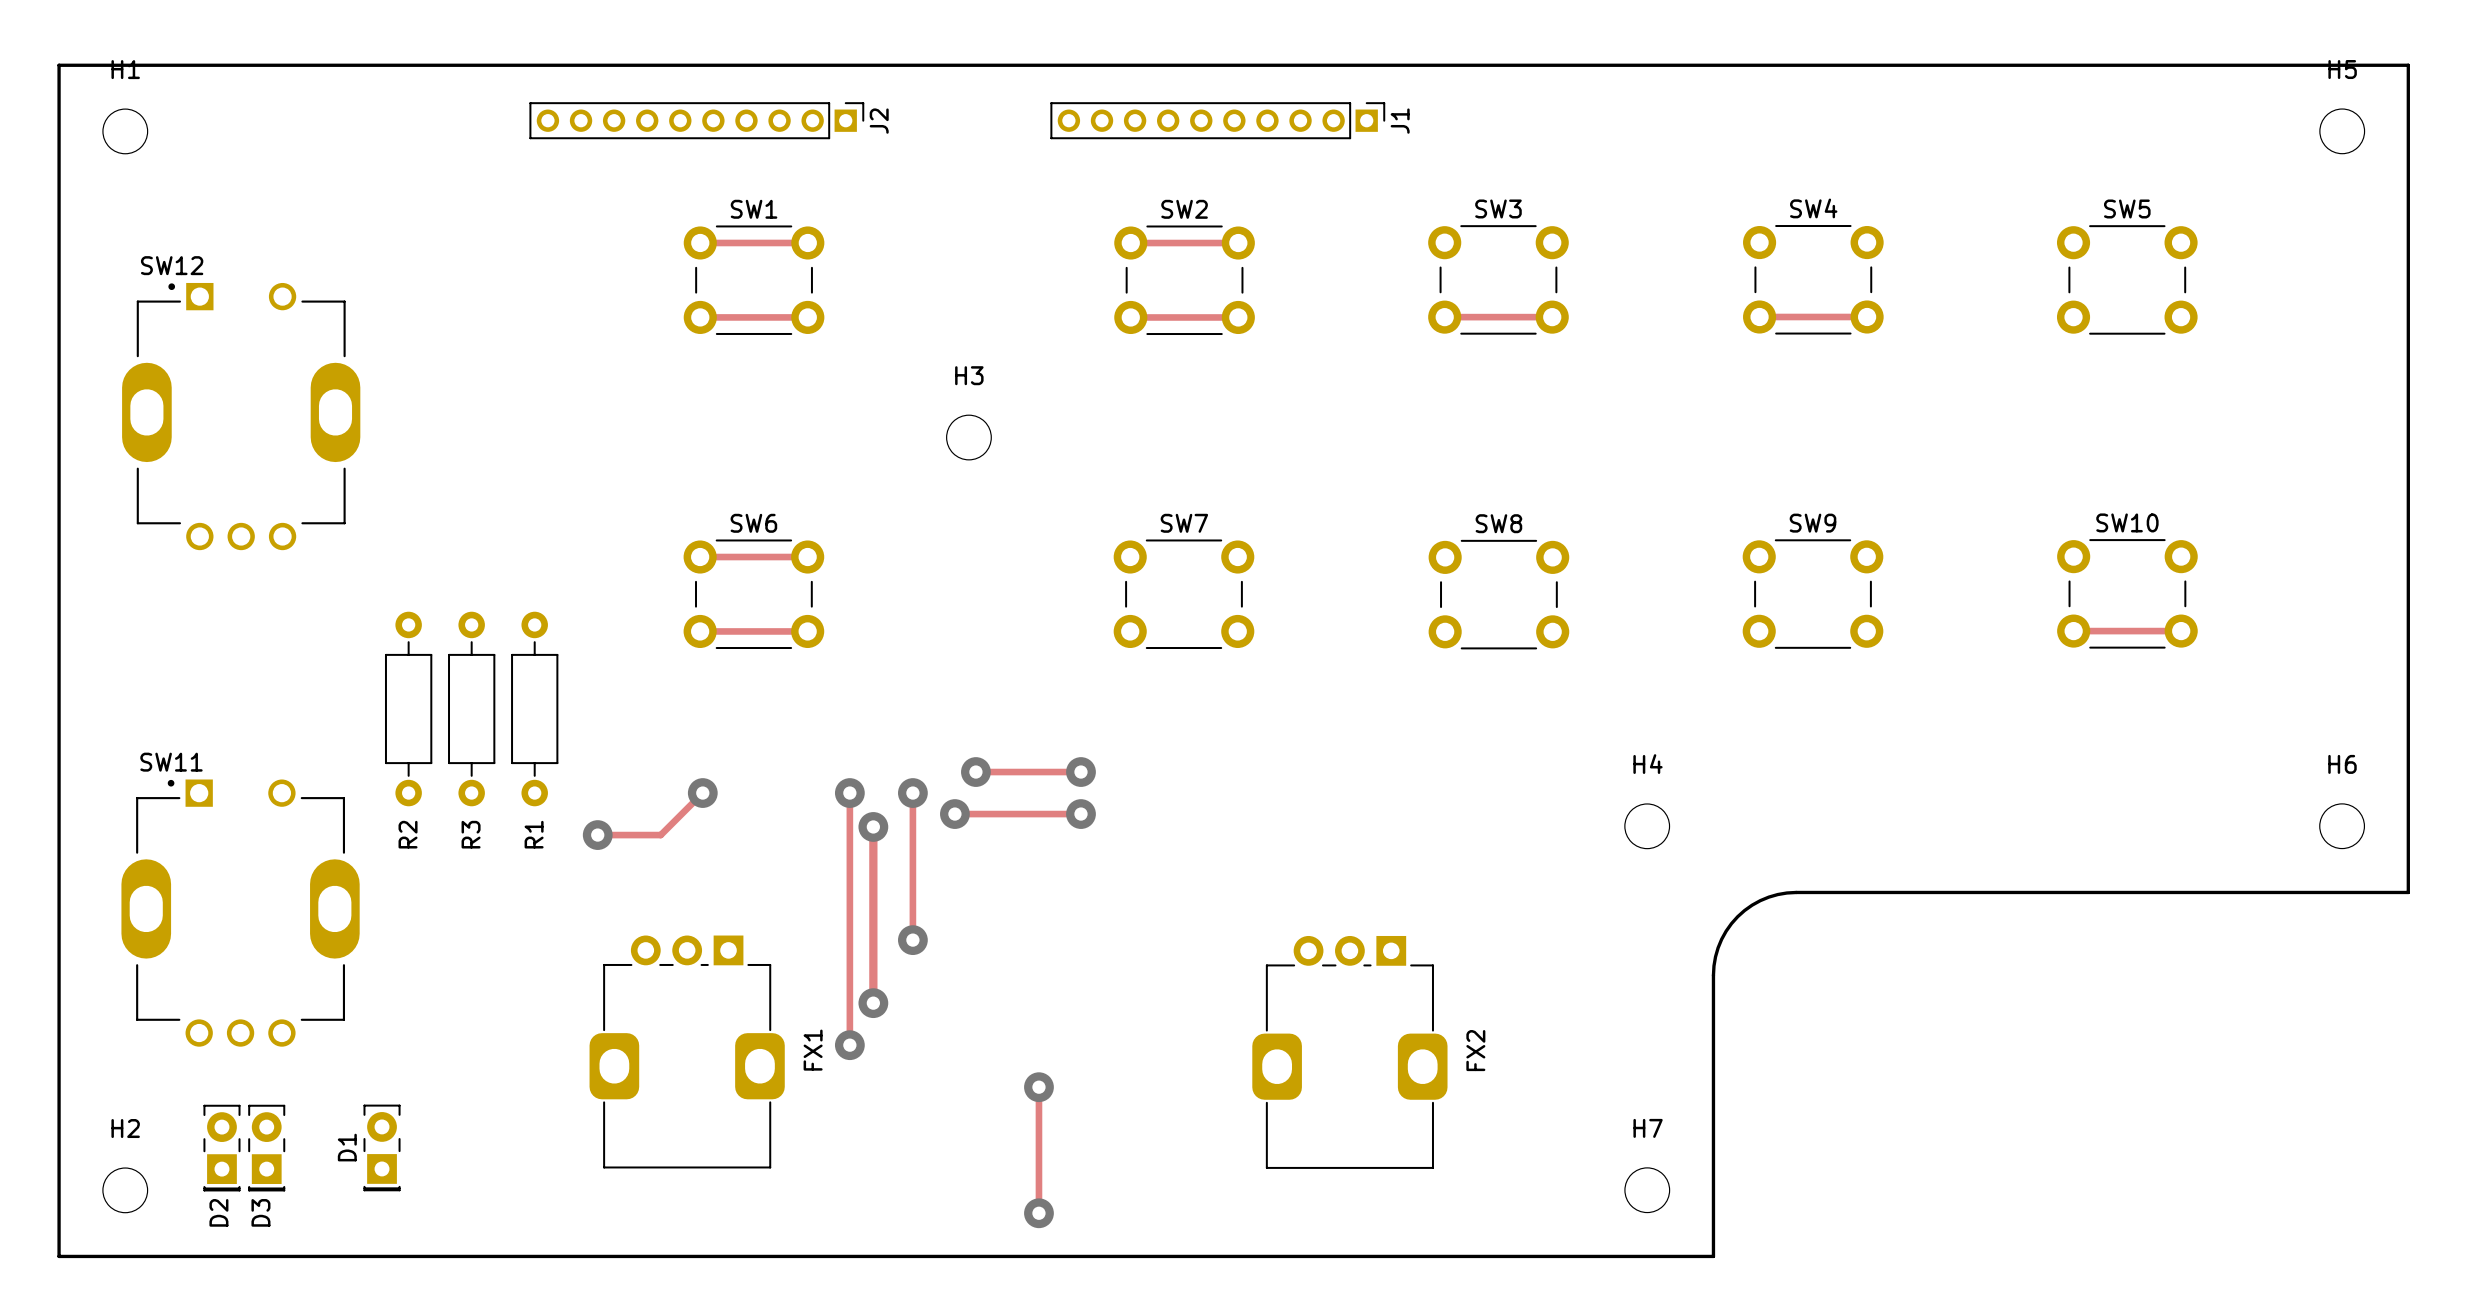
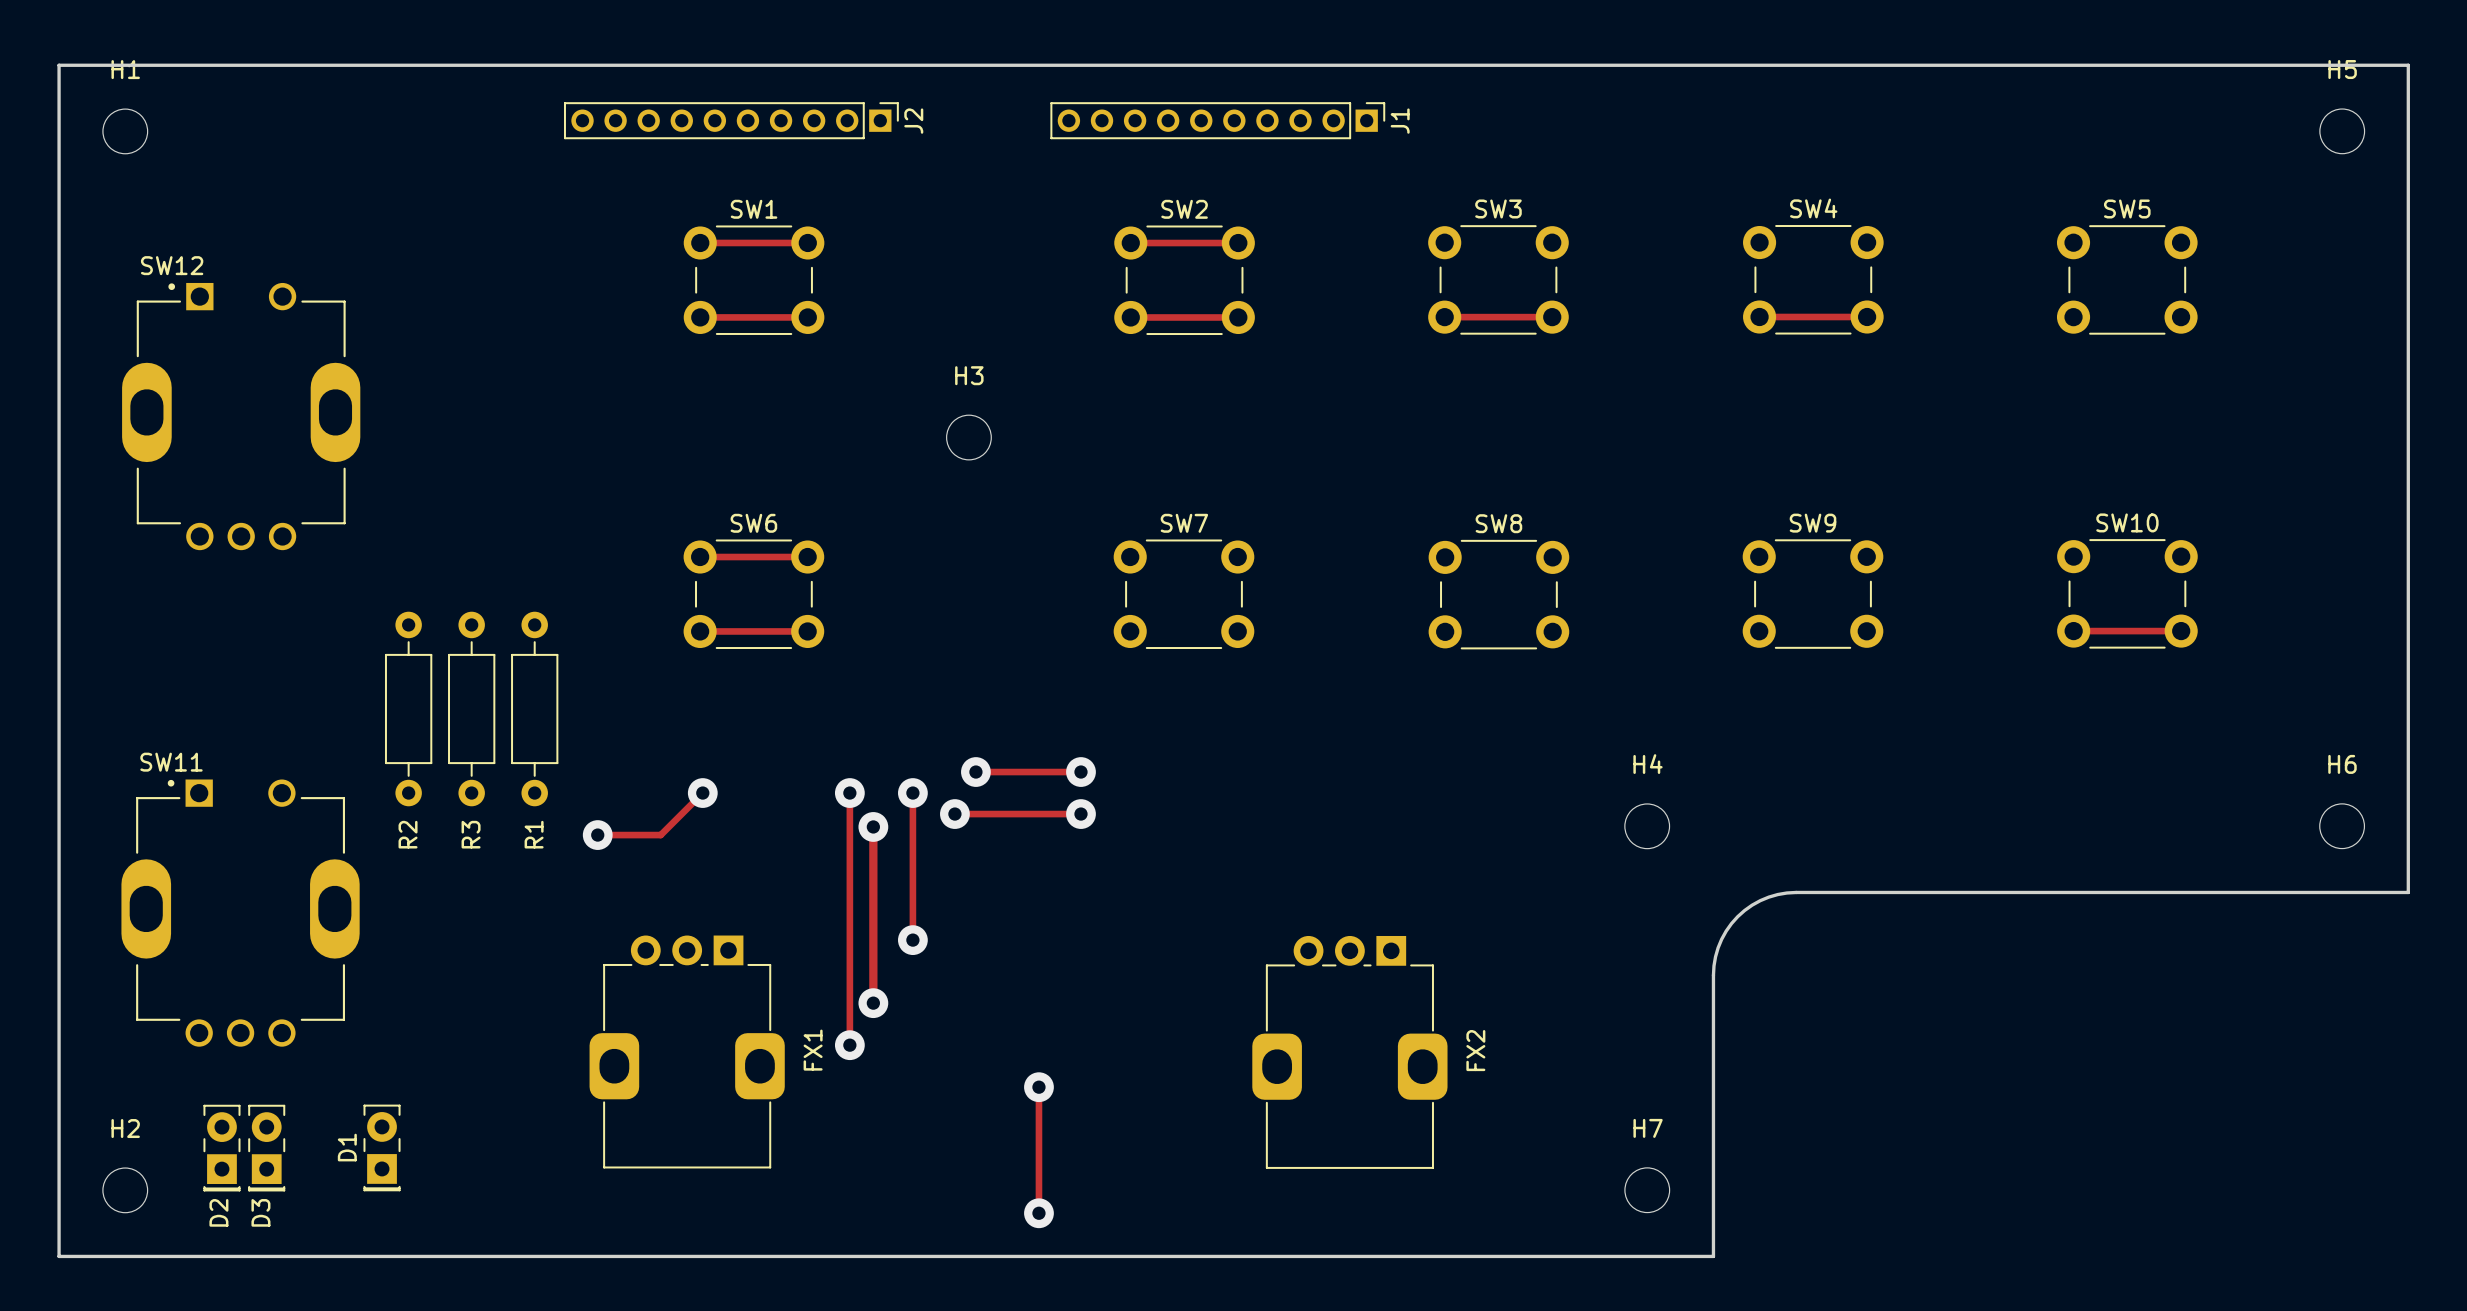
J2 position: (696, 120) -> (731, 120)

